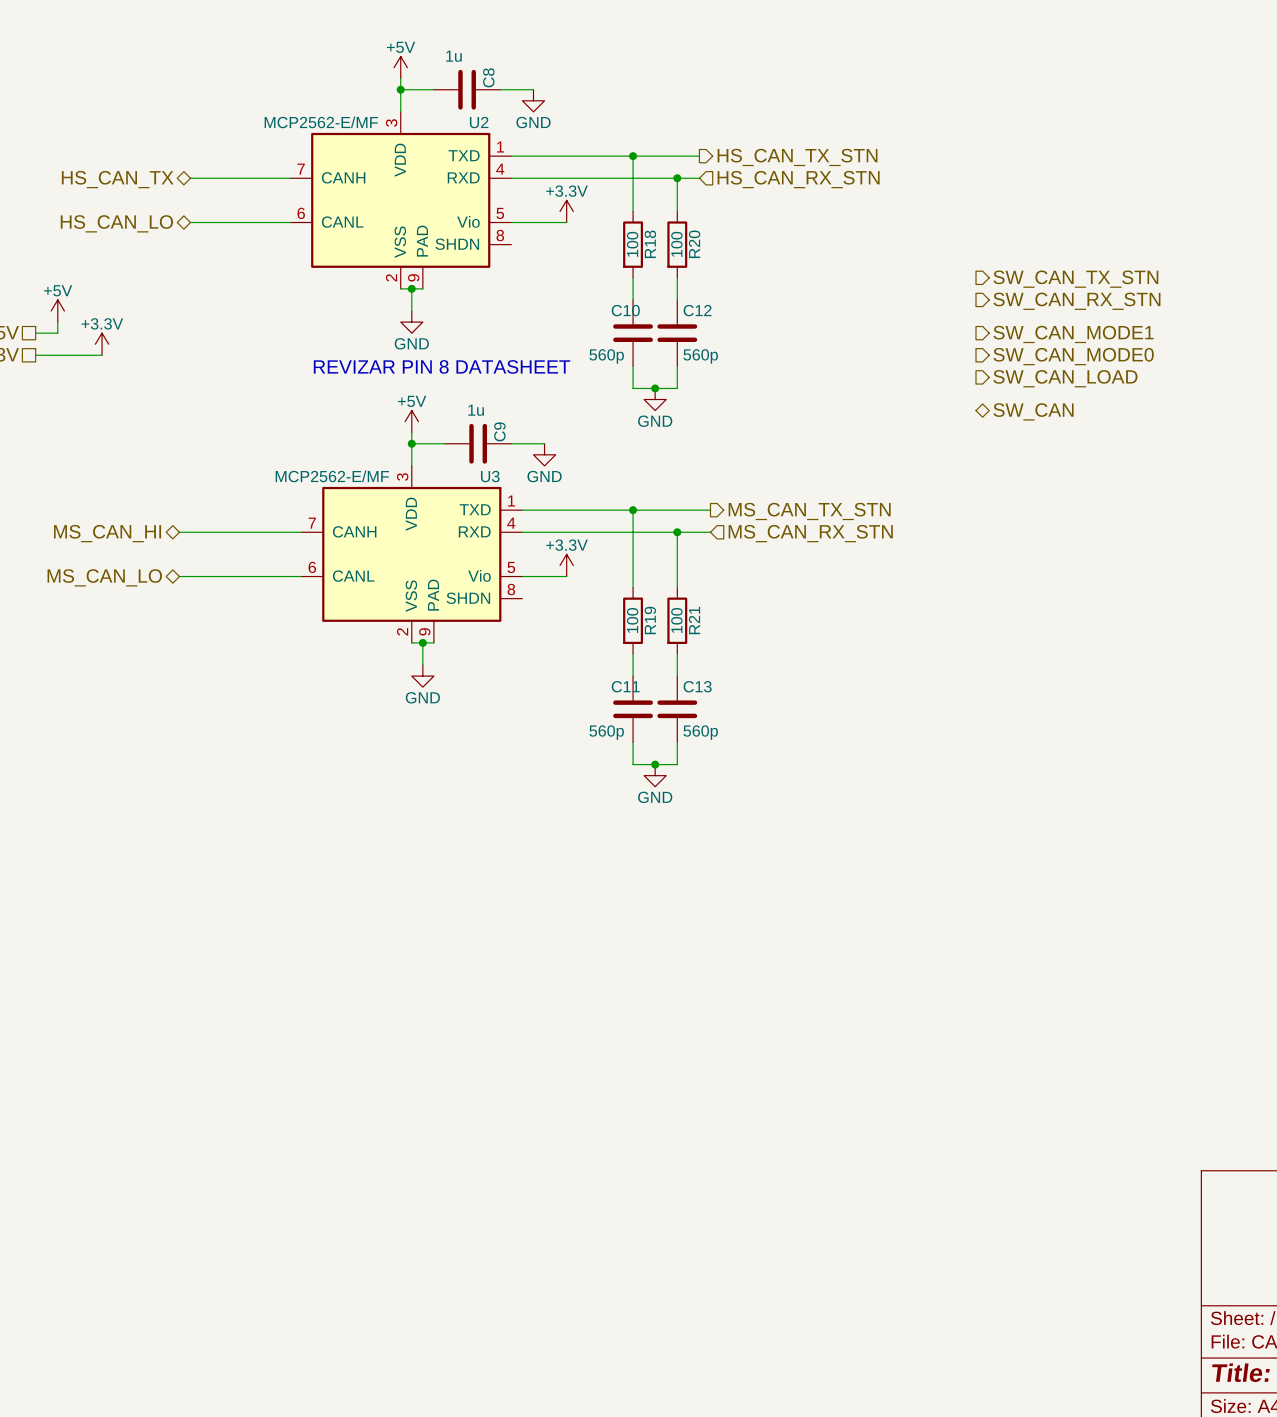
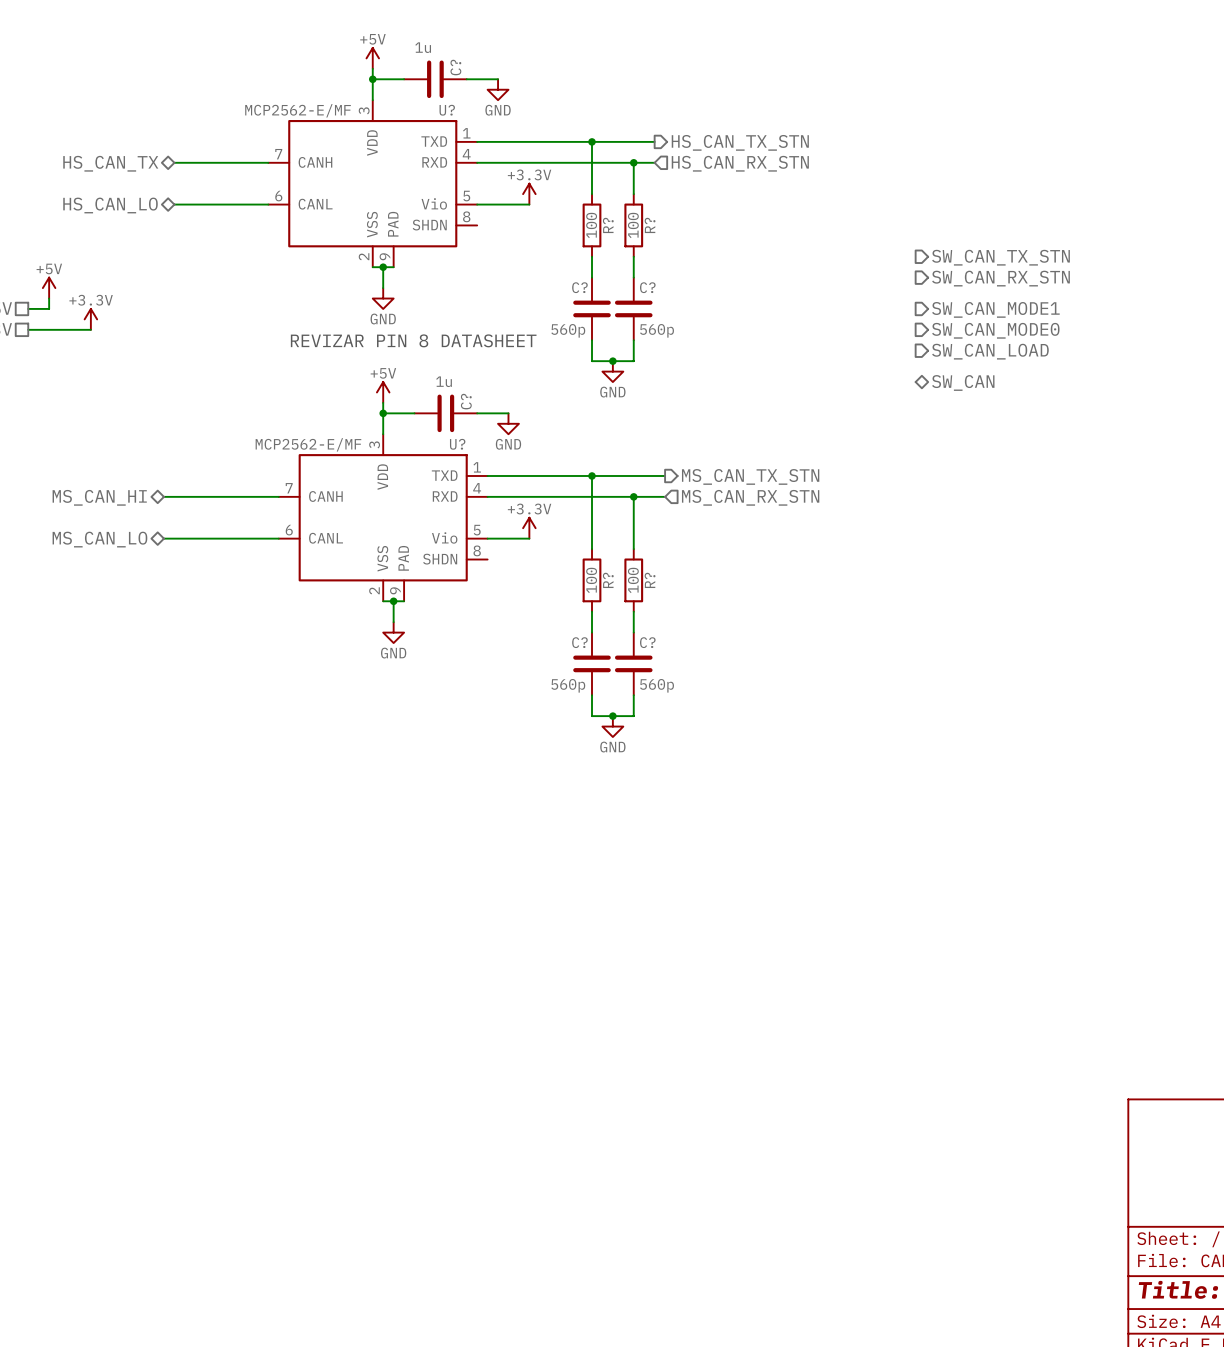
C8 name: C8 (488, 77) -> C? (455, 67)
U2 name: U2 (479, 122) -> U? (447, 110)
R18 name: R18 (650, 244) -> R? (608, 225)
R20 name: R20 (694, 244) -> R? (650, 225)
C10 name: C10 (625, 310) -> C? (579, 287)
C12 name: C12 (697, 310) -> C? (647, 287)
C9 name: C9 (499, 431) -> C? (466, 401)
U3 name: U3 (490, 476) -> U? (457, 444)
R19 name: R19 (650, 620) -> R? (608, 580)
R21 name: R21 (694, 620) -> R? (650, 580)
C11 name: C11 (625, 686) -> C? (579, 642)
C13 name: C13 (697, 686) -> C? (647, 642)

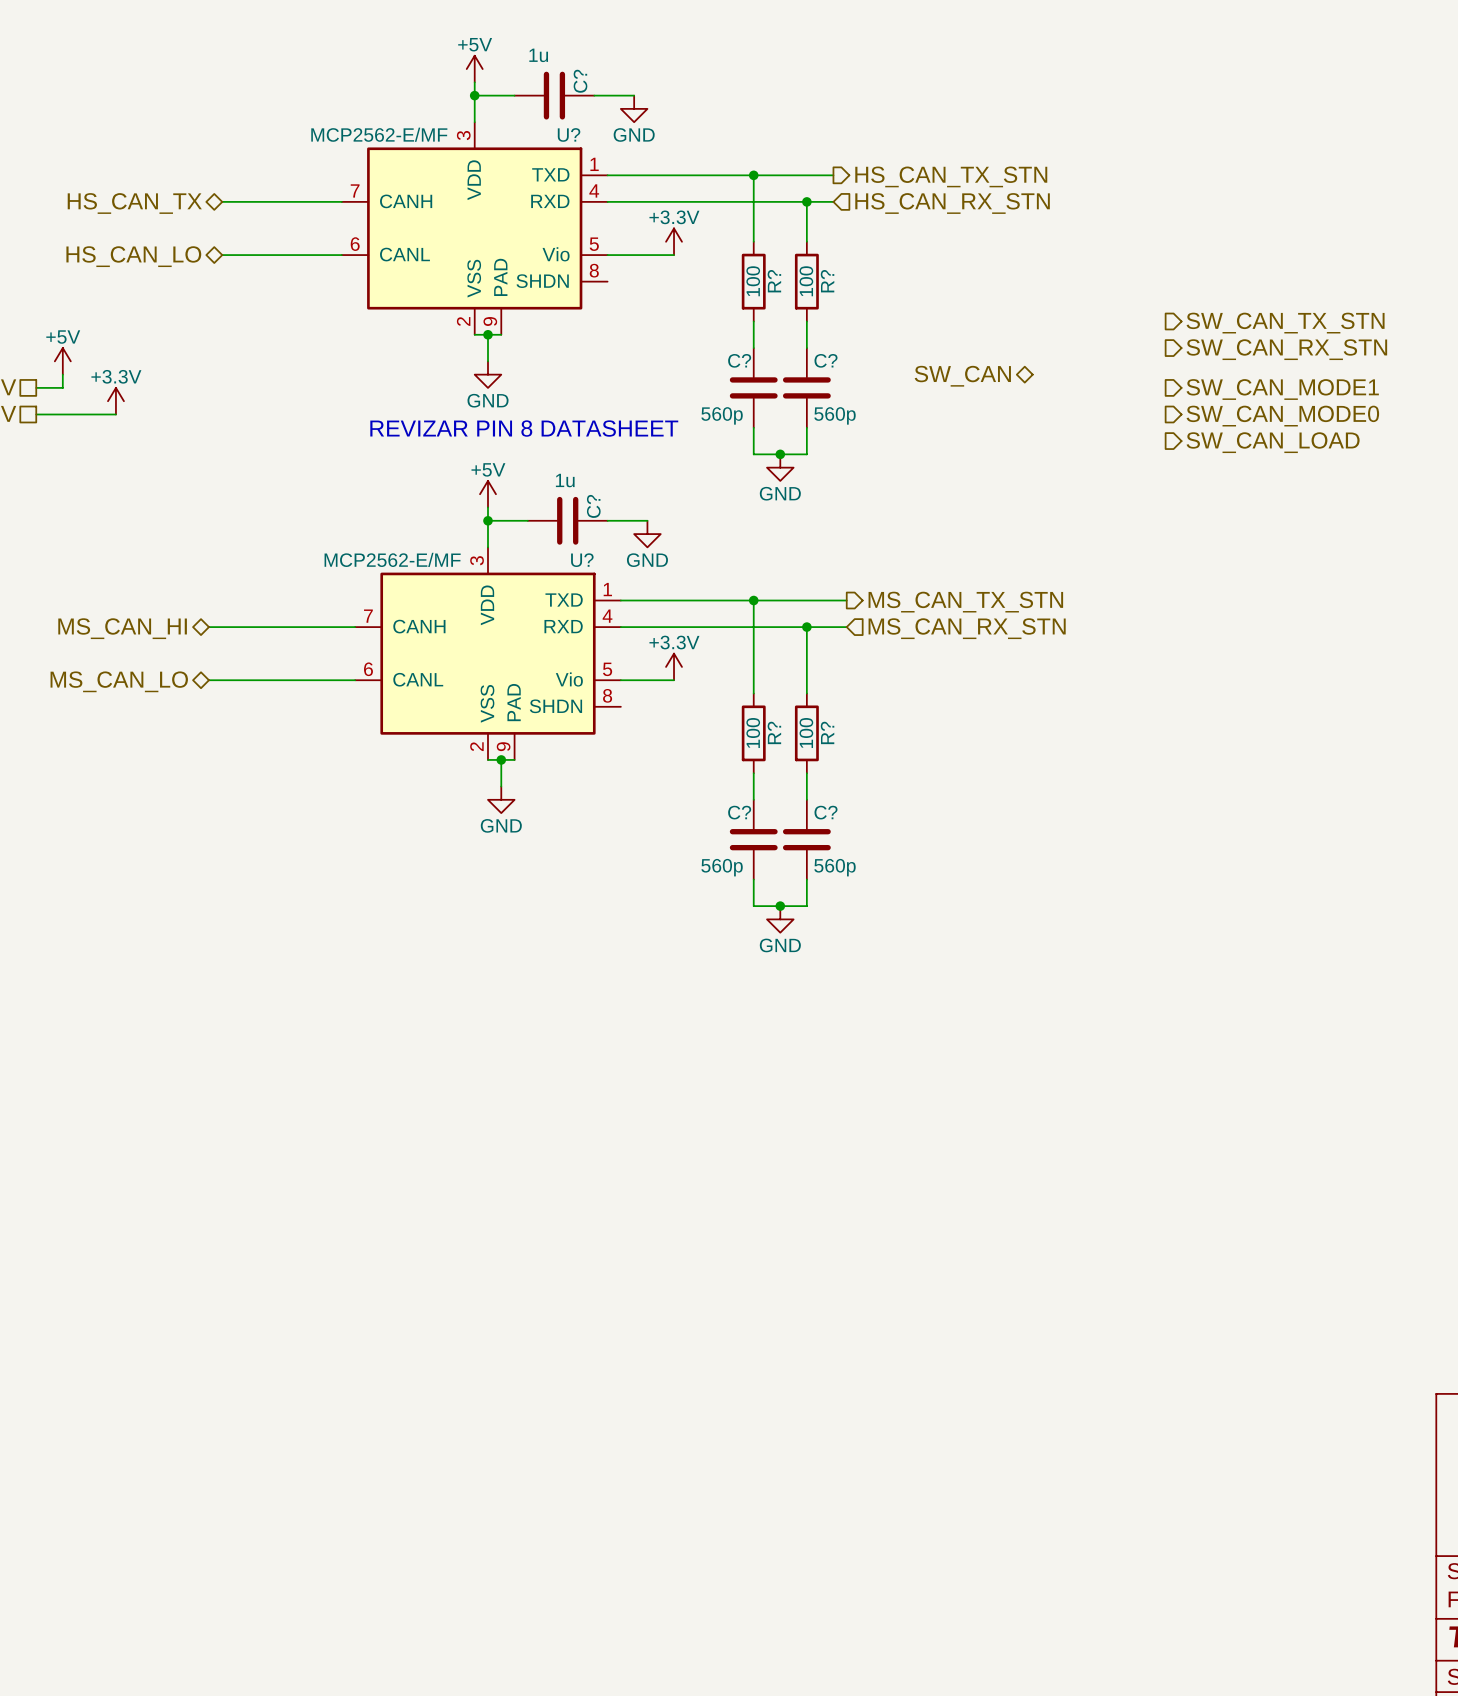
hierarchical label rotation: 0° (963, 382) -> 180° (962, 376)
hierarchical label position: SW_CAN (963, 382) -> SW_CAN (962, 376)

